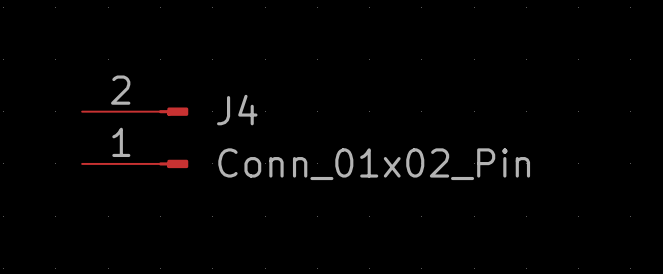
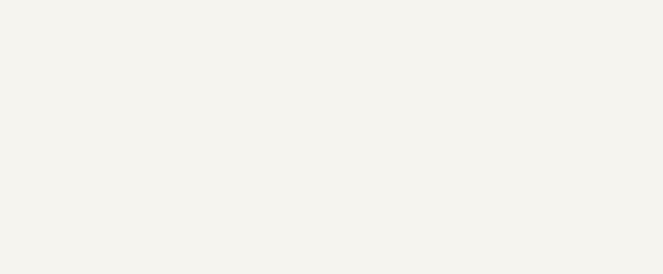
J4: Conn_01x02_Pin (135, 137) -> none

